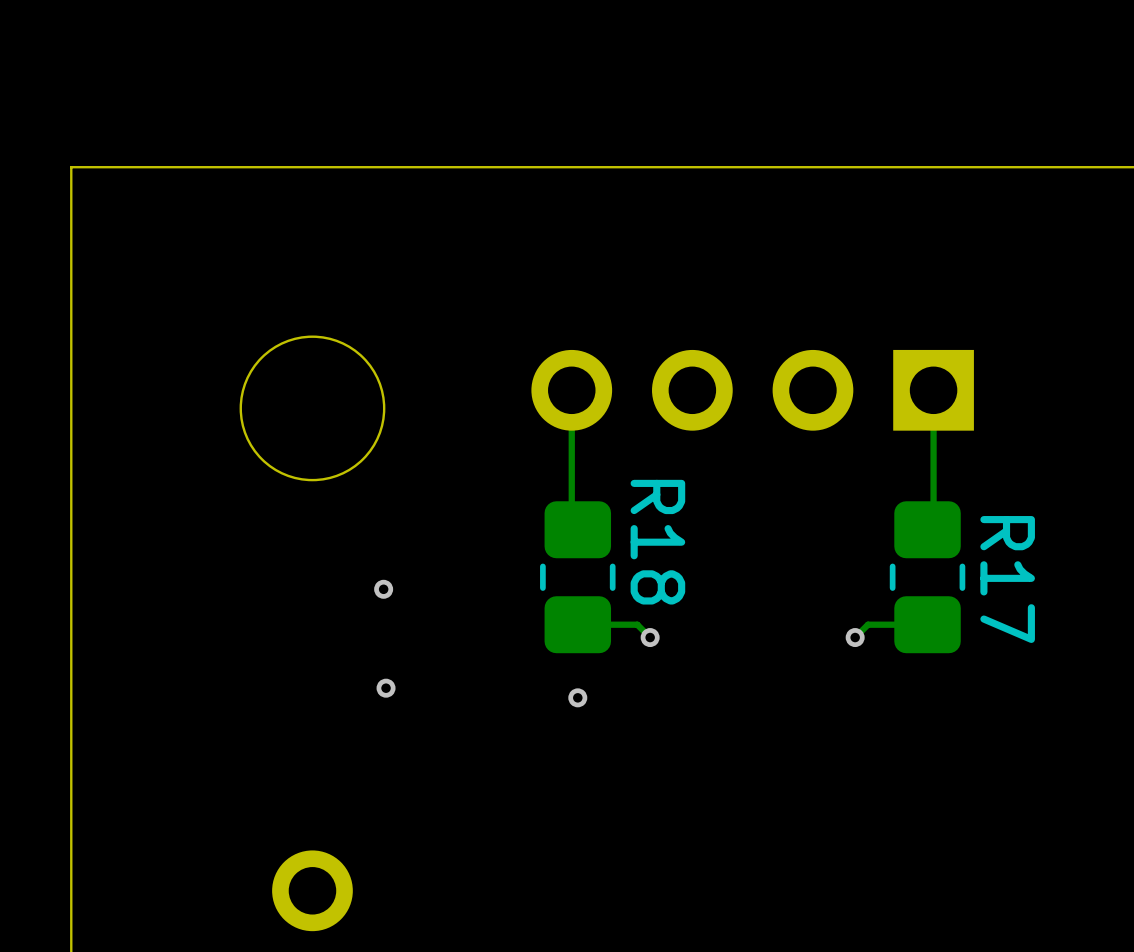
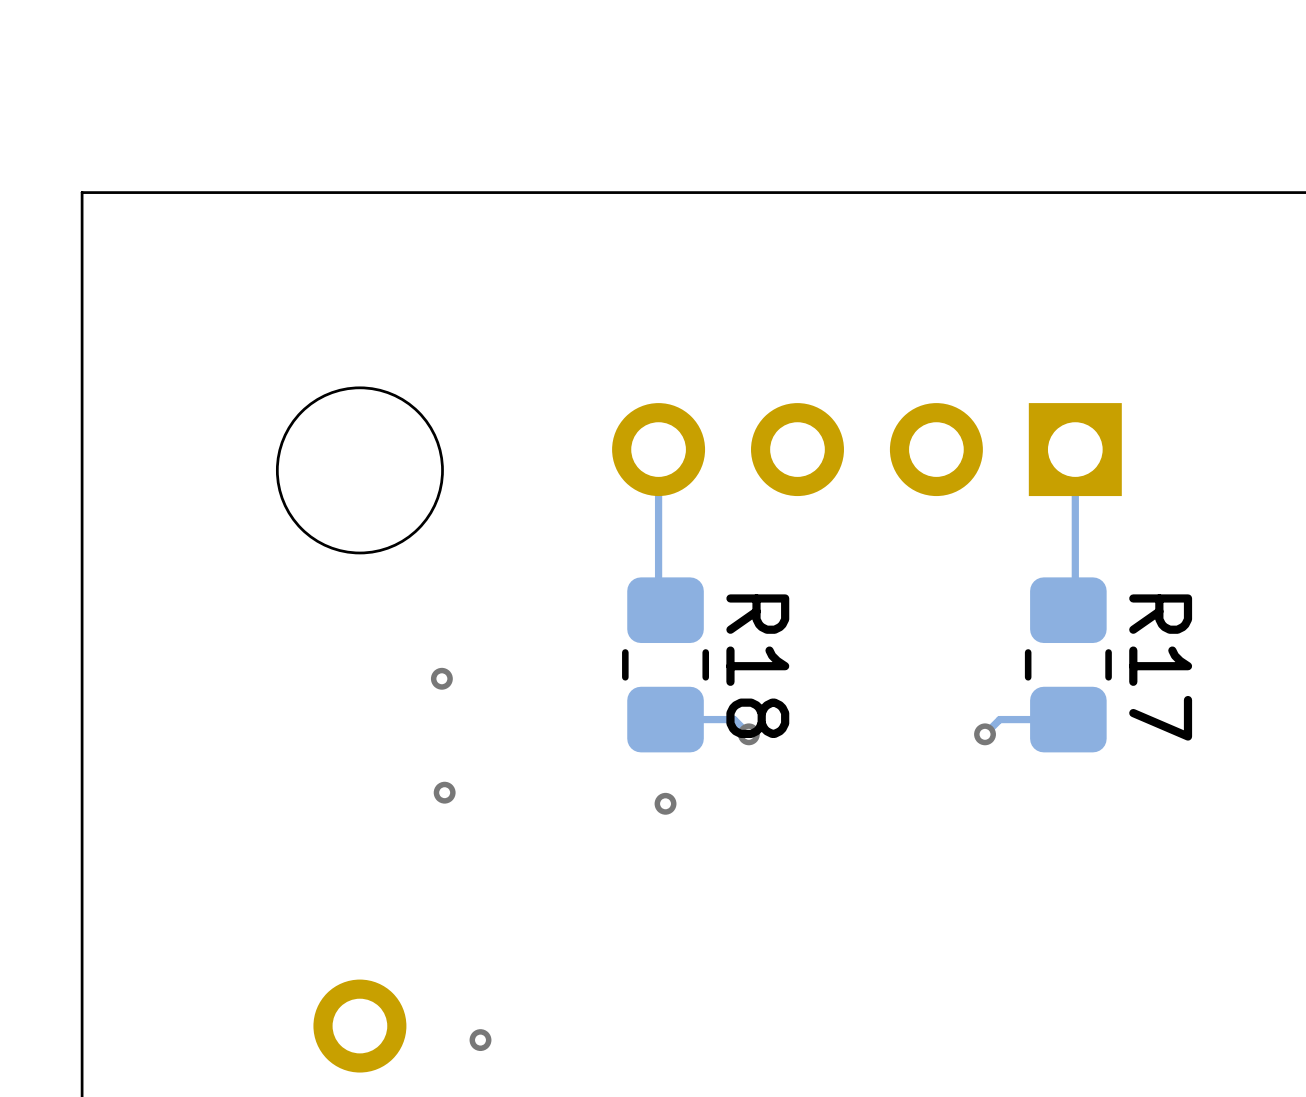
R18 name position: R18 (657, 542) -> R18 (757, 666)
via: none -> (480, 1040)

